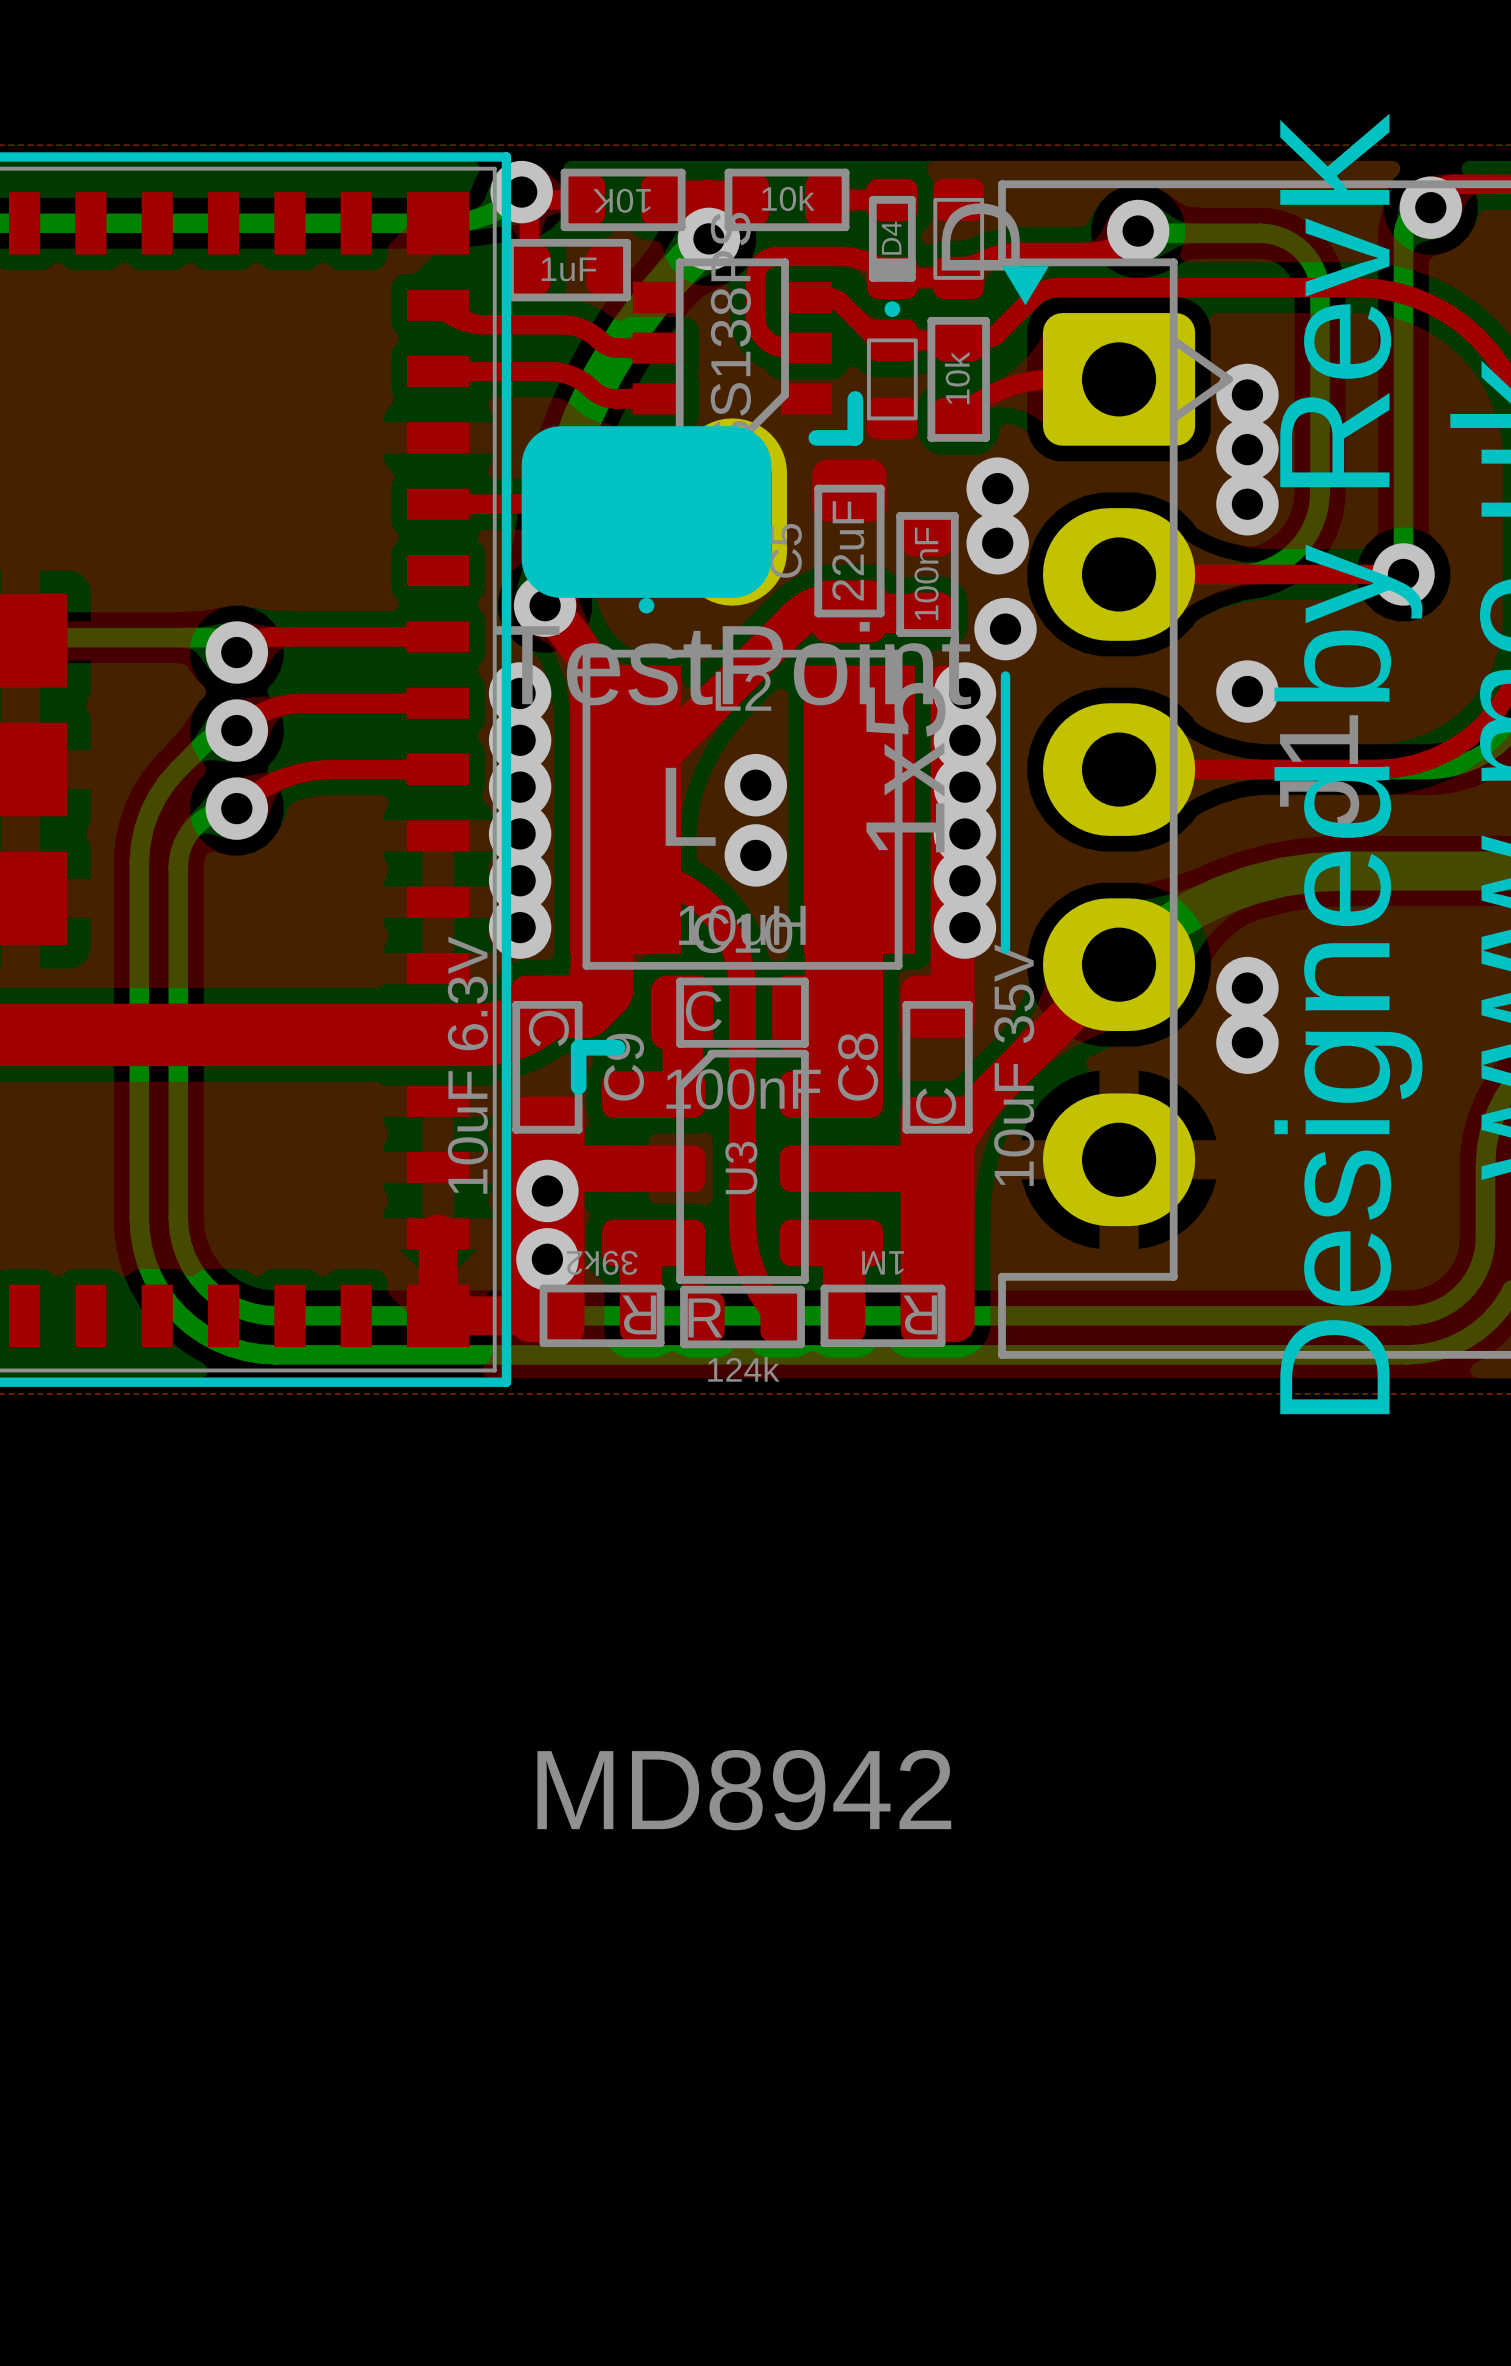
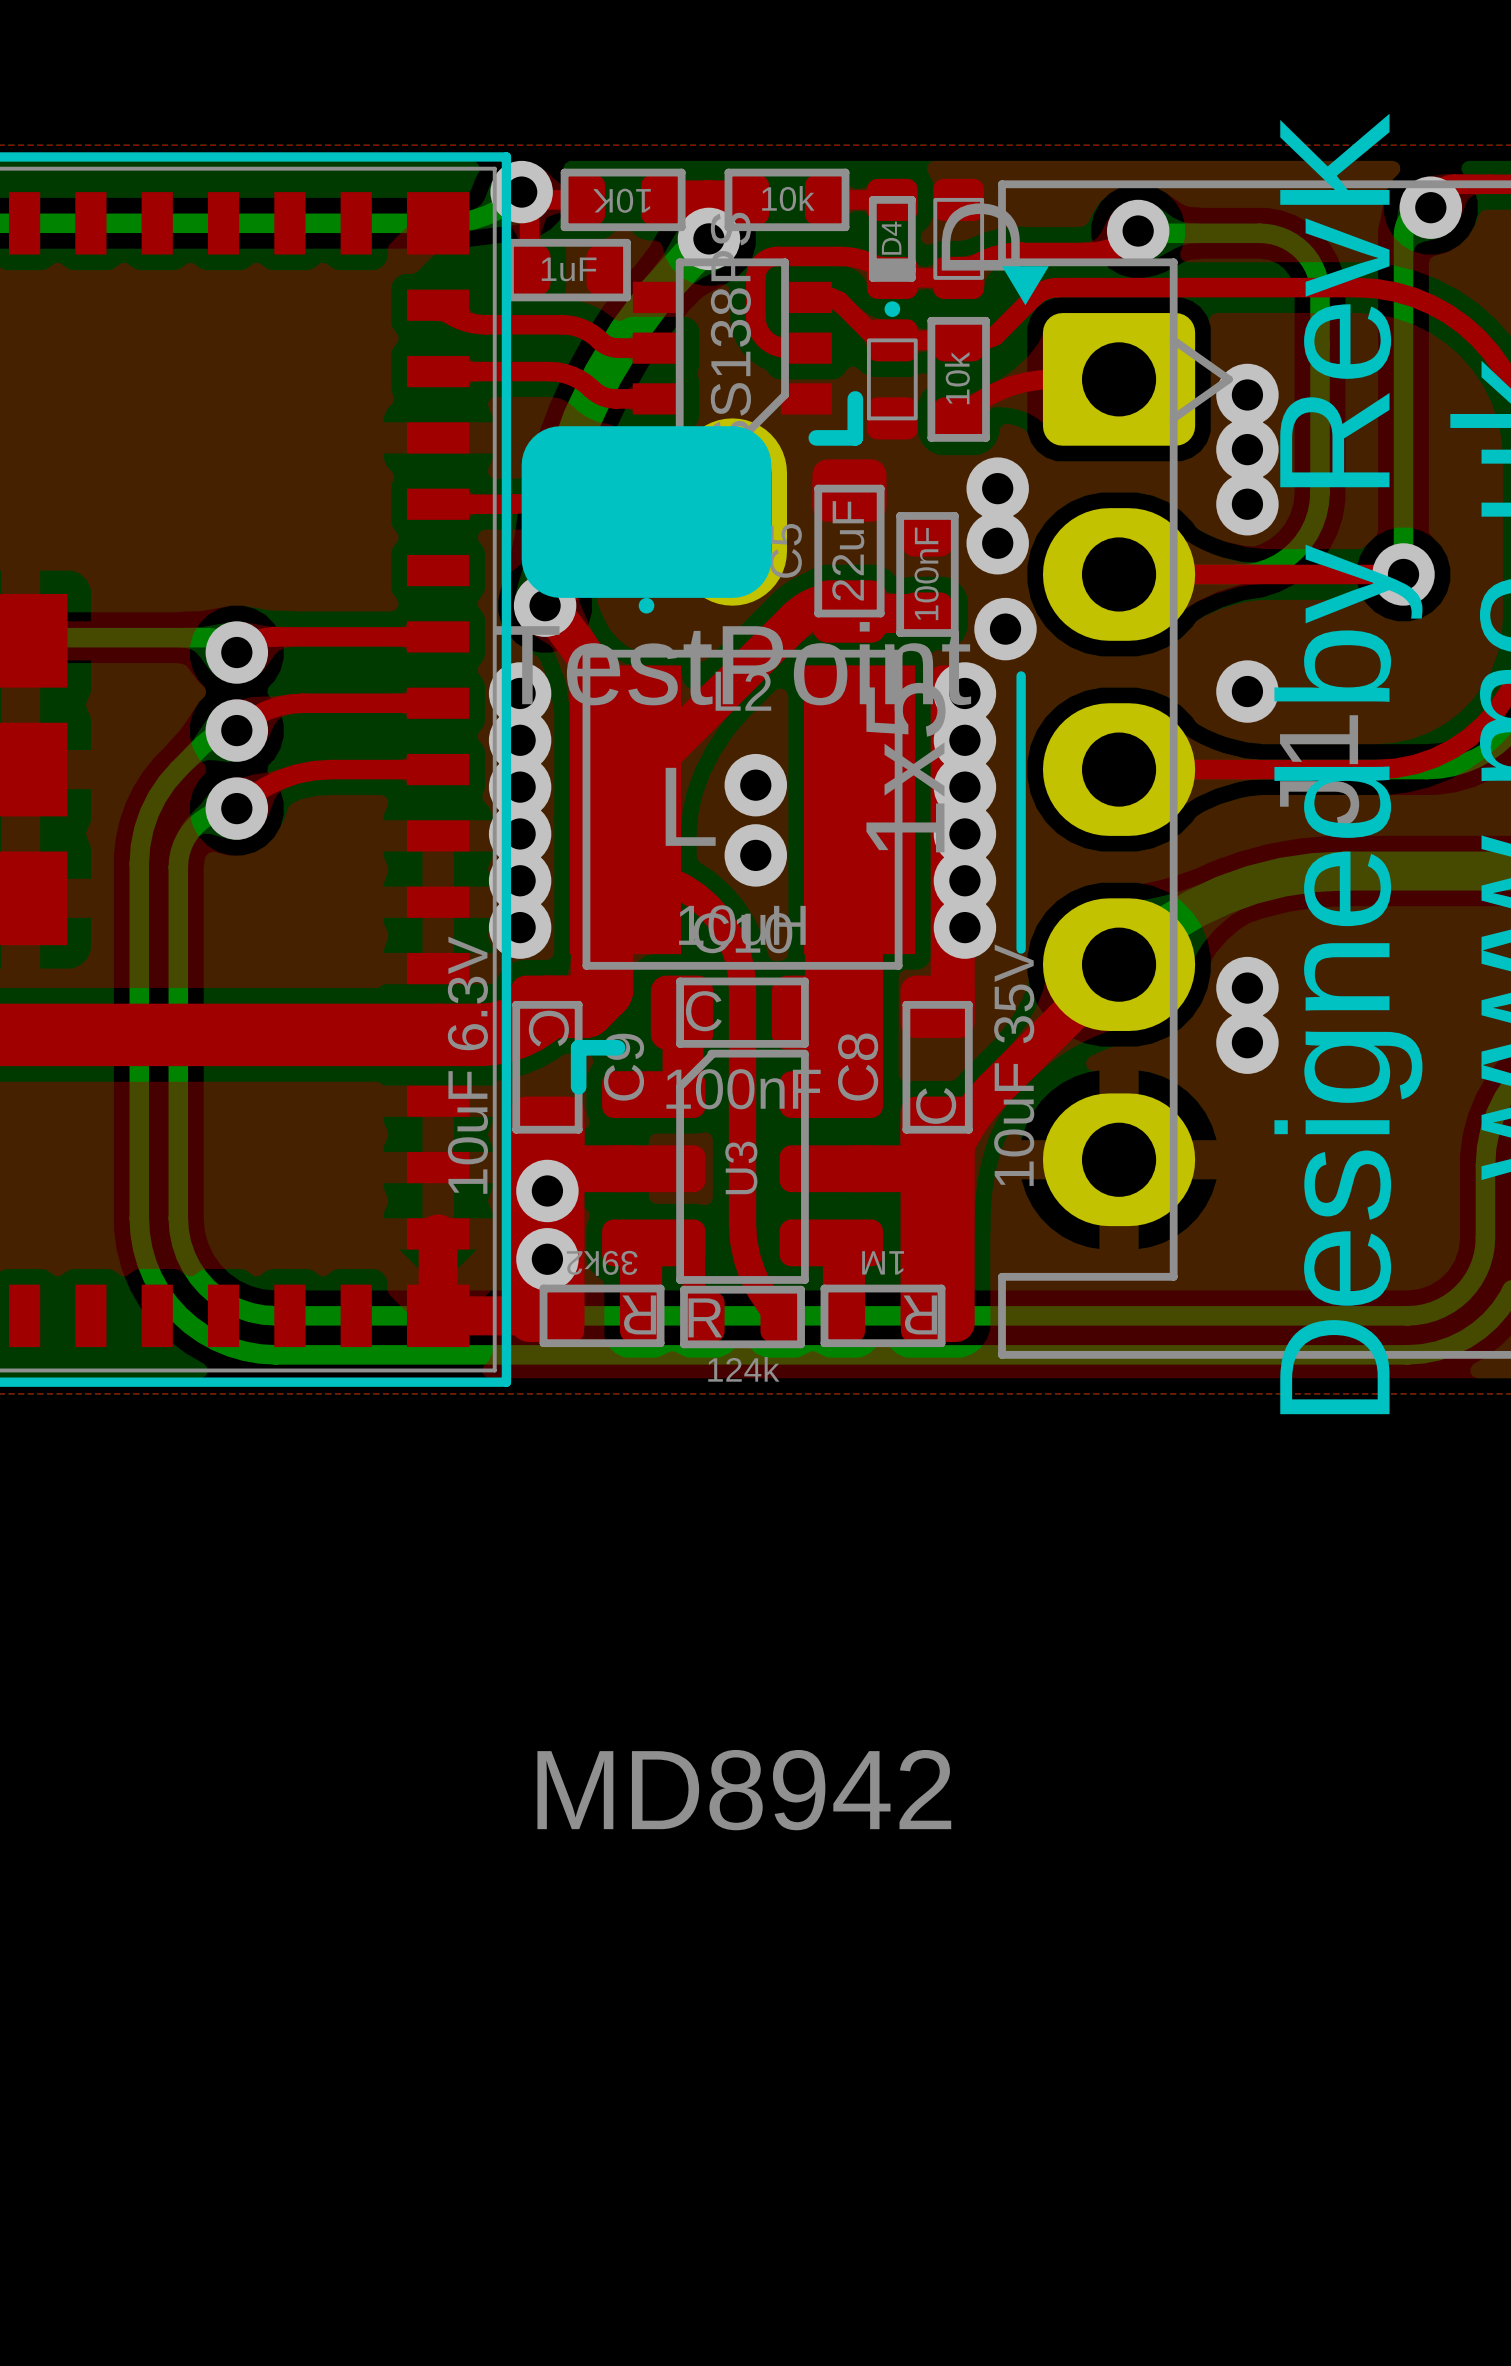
line: (1005, 675) (1005, 949) -> (1021, 675) (1021, 949)

